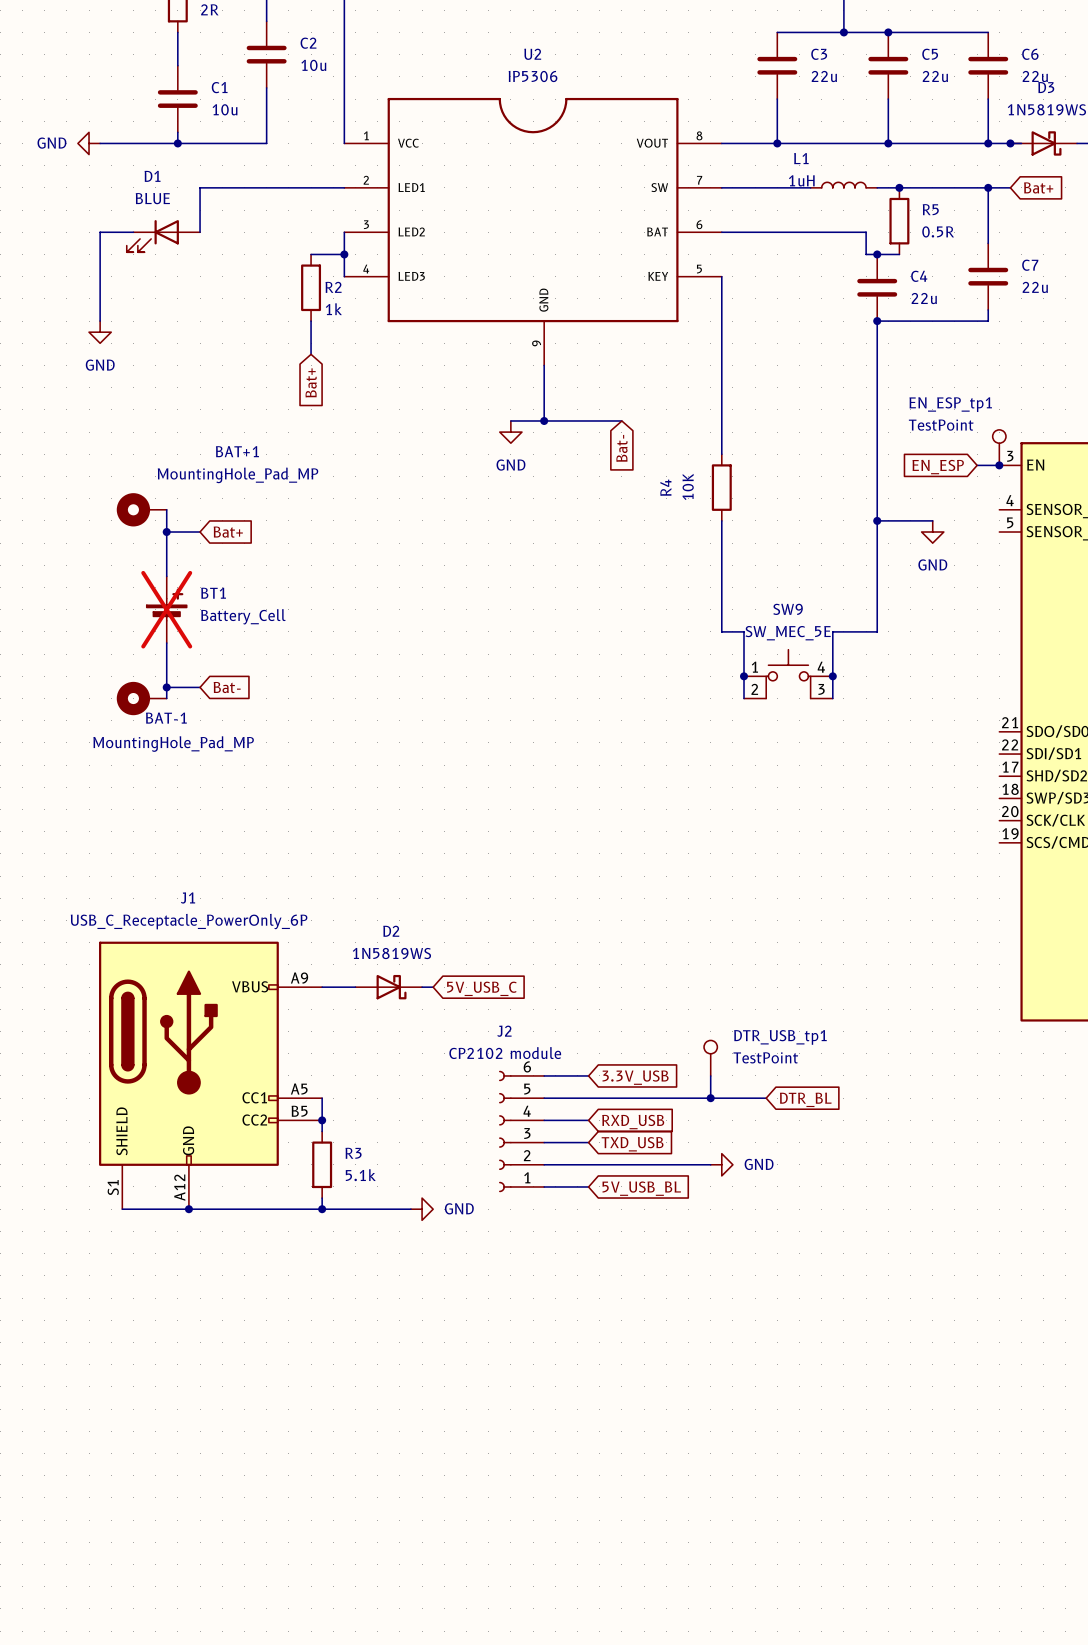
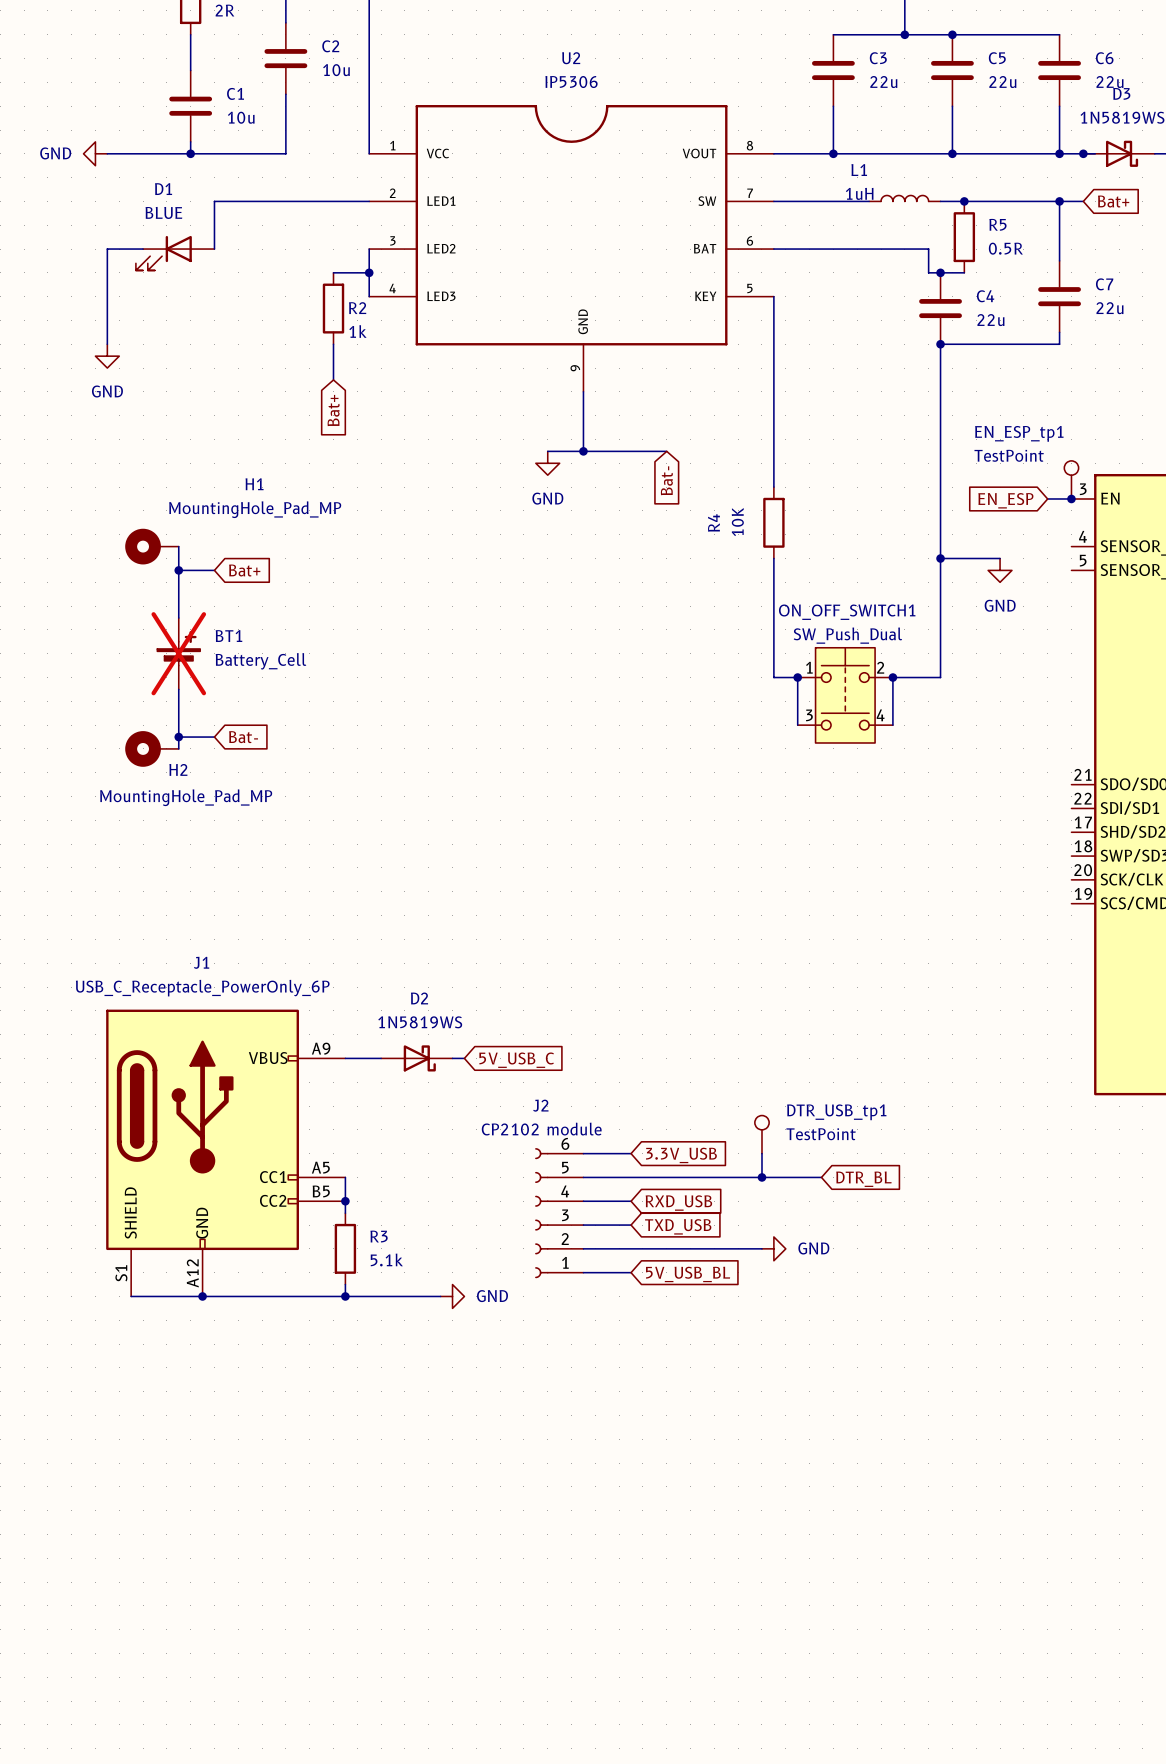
BAT+1 name: BAT+1 (237, 451) -> H1 (254, 484)
ON_OFF_SWITCH1: none -> SW_Push_Dual (845, 695)
SW9: SW_MEC_5E (788, 674) -> none
wire: (744, 676) (744, 698) -> none
junction position: (744, 676) -> (797, 677)
wire: (832, 676) (832, 698) -> none
junction position: (832, 676) -> (892, 677)
BAT-1 name: BAT-1 (166, 718) -> H2 (178, 769)

